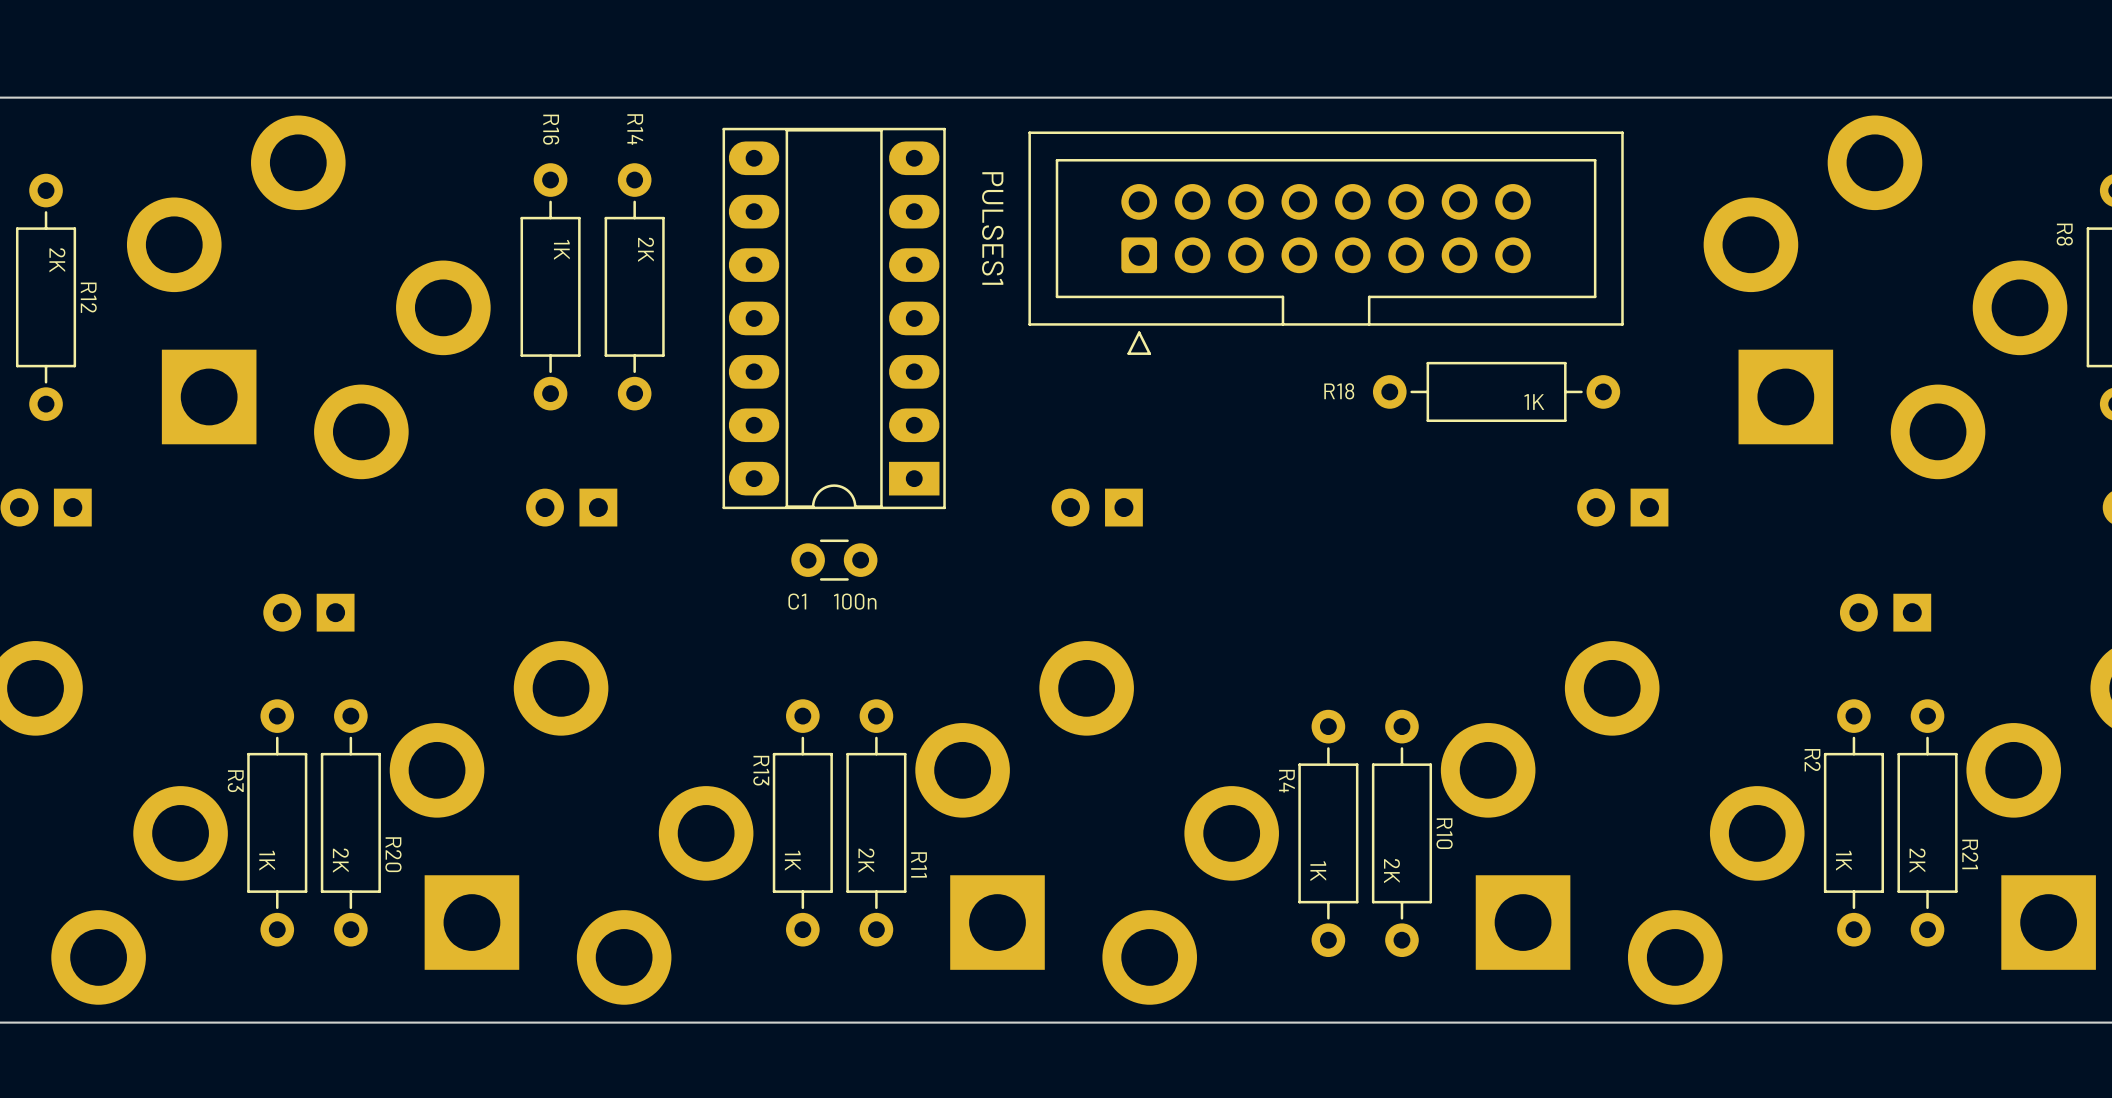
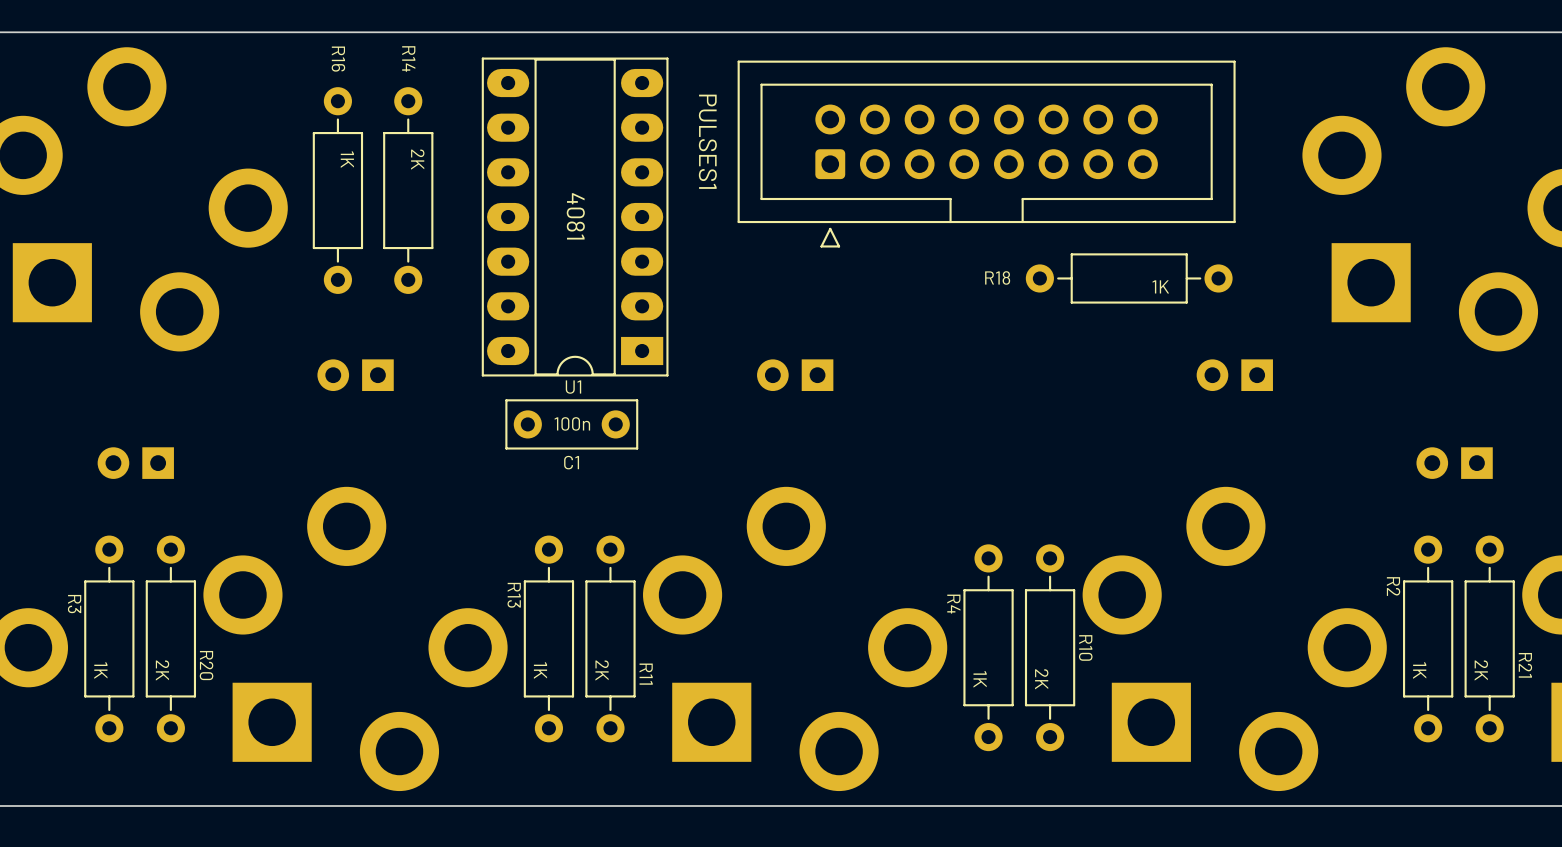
U1 value: none -> 4081 (575, 216)
U1 name: none -> U1 (573, 387)
C1 footprint: [791, 539, 878, 581] -> [505, 399, 639, 450]
C1 value position: 100n (855, 601) -> 100n (572, 423)

